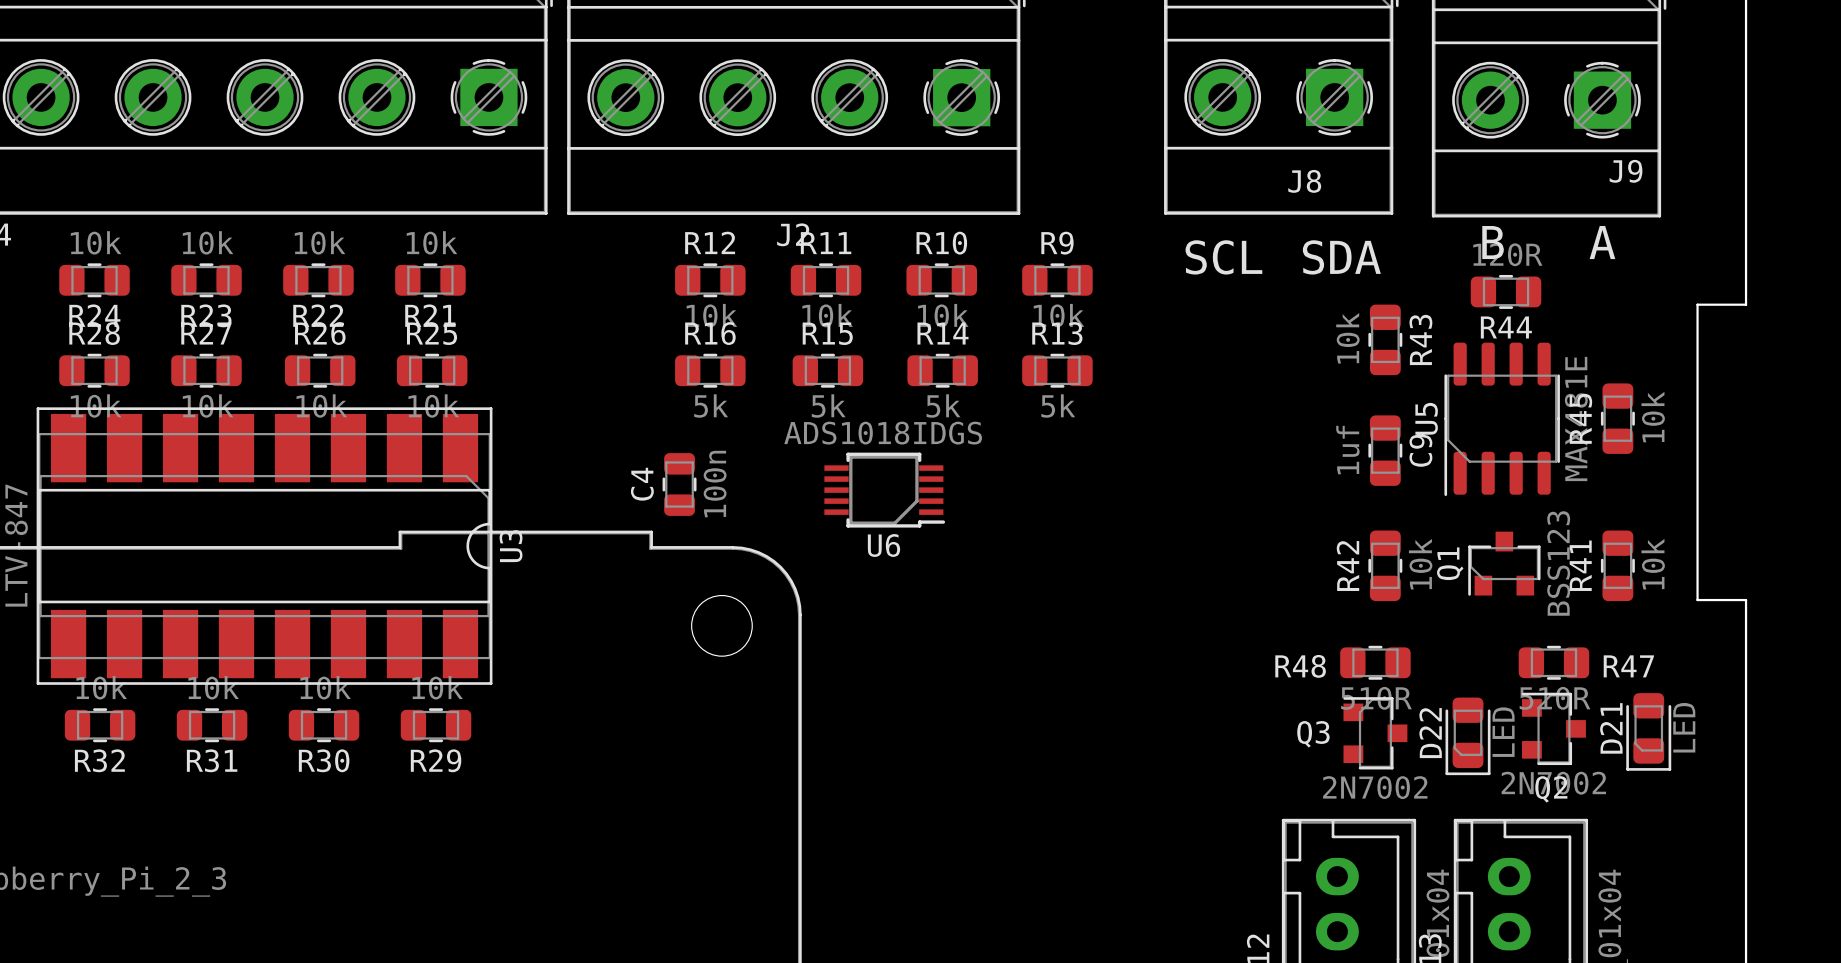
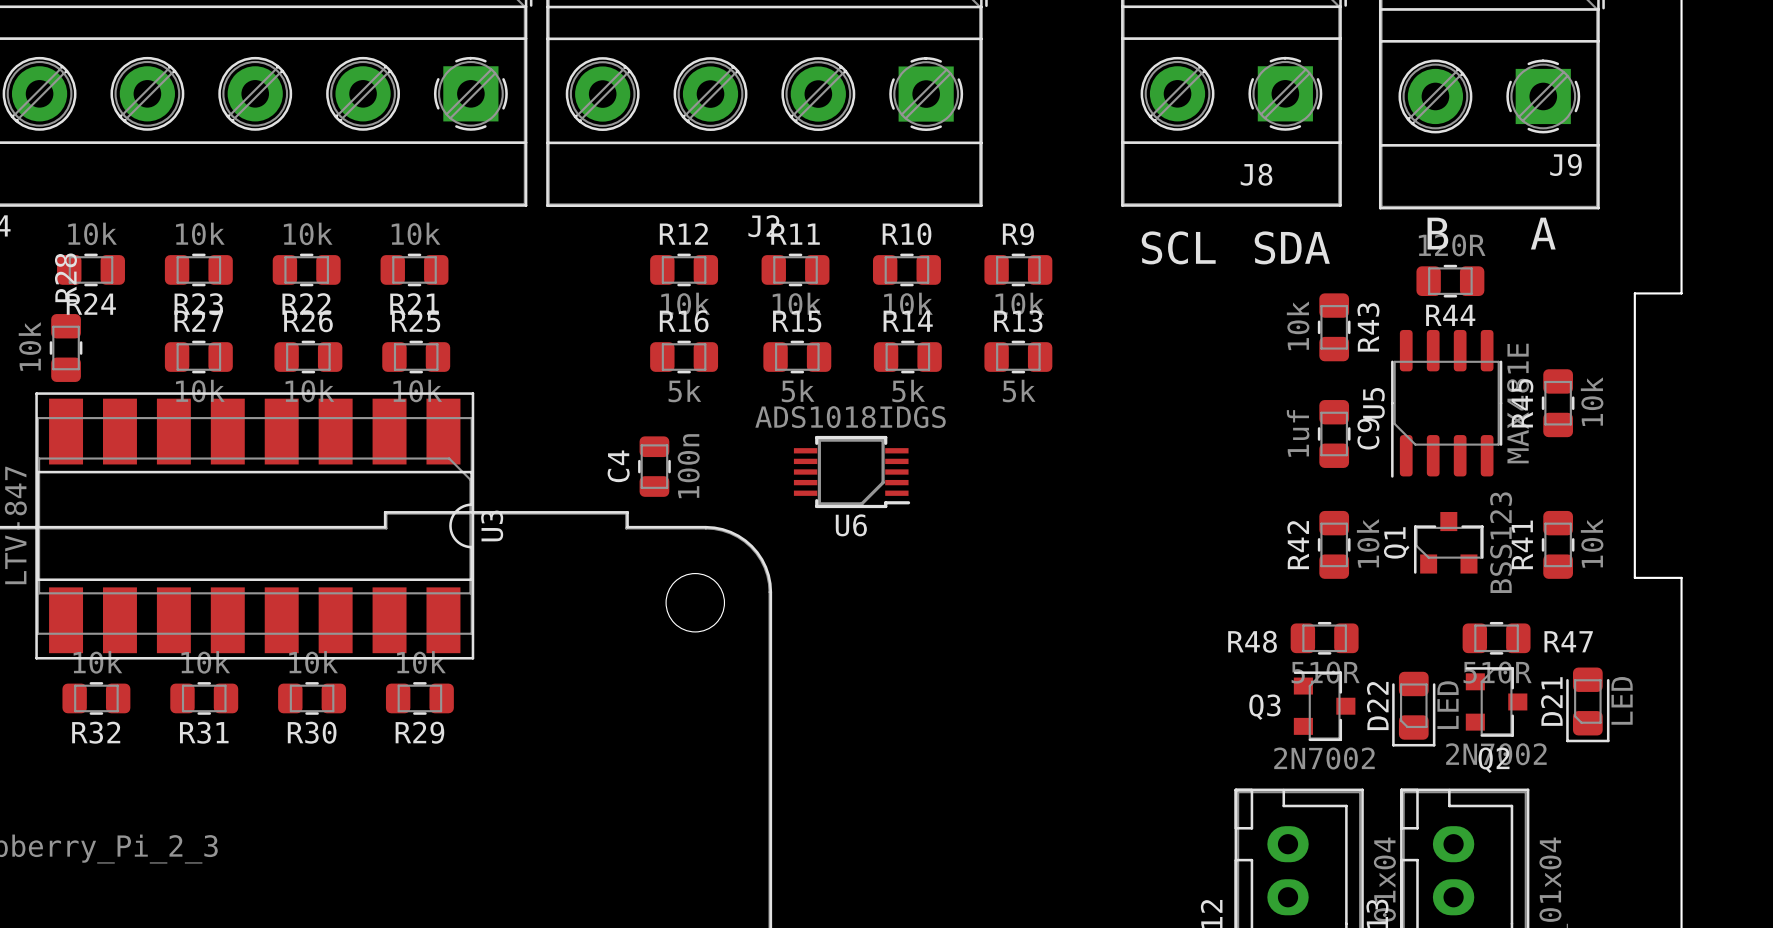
R28 rotation: 0° (94, 370) -> 90° clockwise (66, 347)

